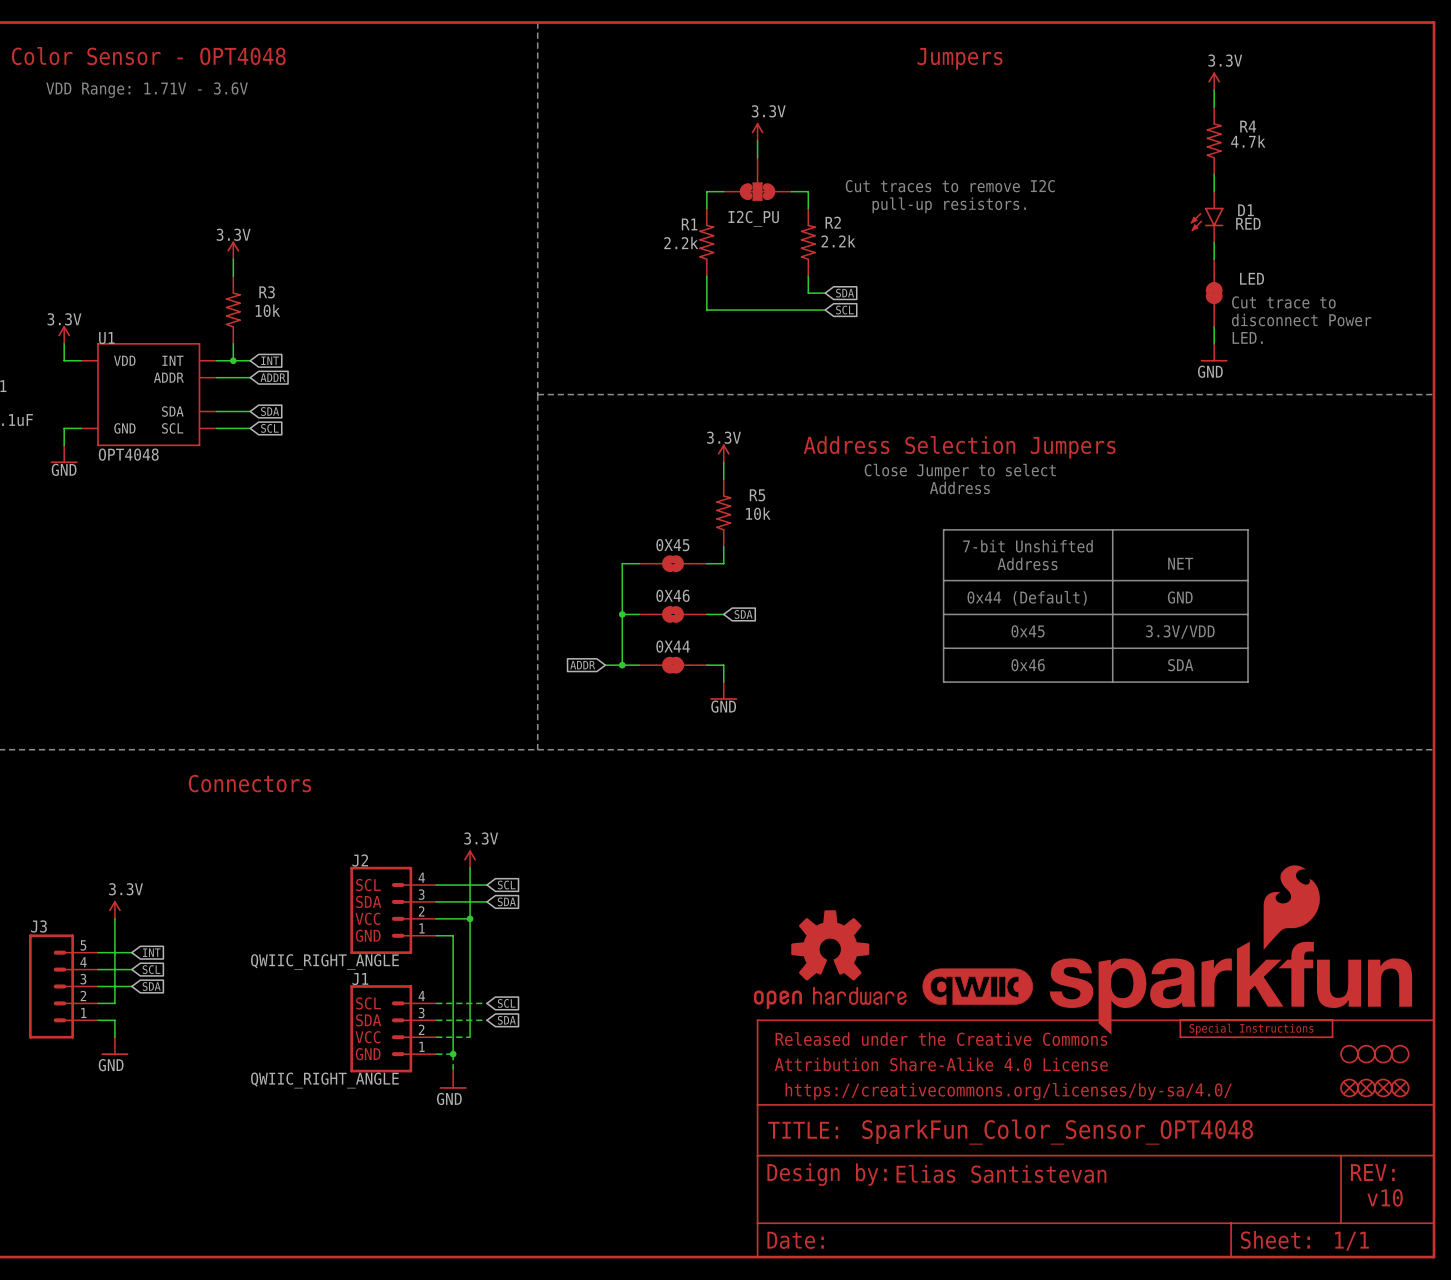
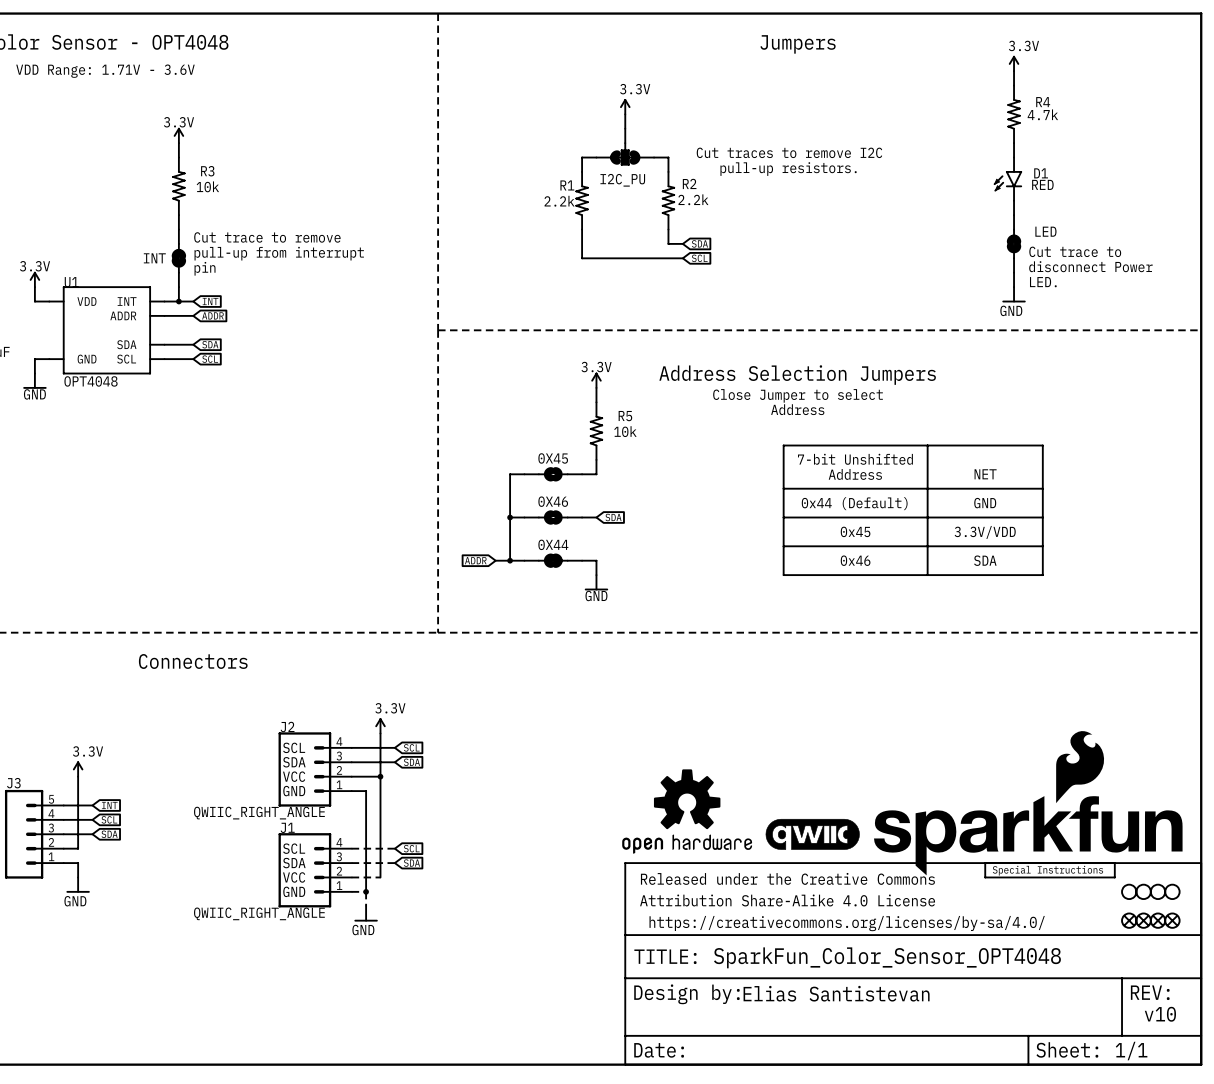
wire: none -> (178, 143) (178, 157)
power symbol position: 3.3V (233, 250) -> 3.3V (178, 135)
text: none -> Cut trace to remove (267, 237)
text: none -> pull-up from interrupt (279, 253)
R3 position: (233, 310) -> (178, 186)
INT: none -> (178, 258)
text: none -> pin (205, 268)

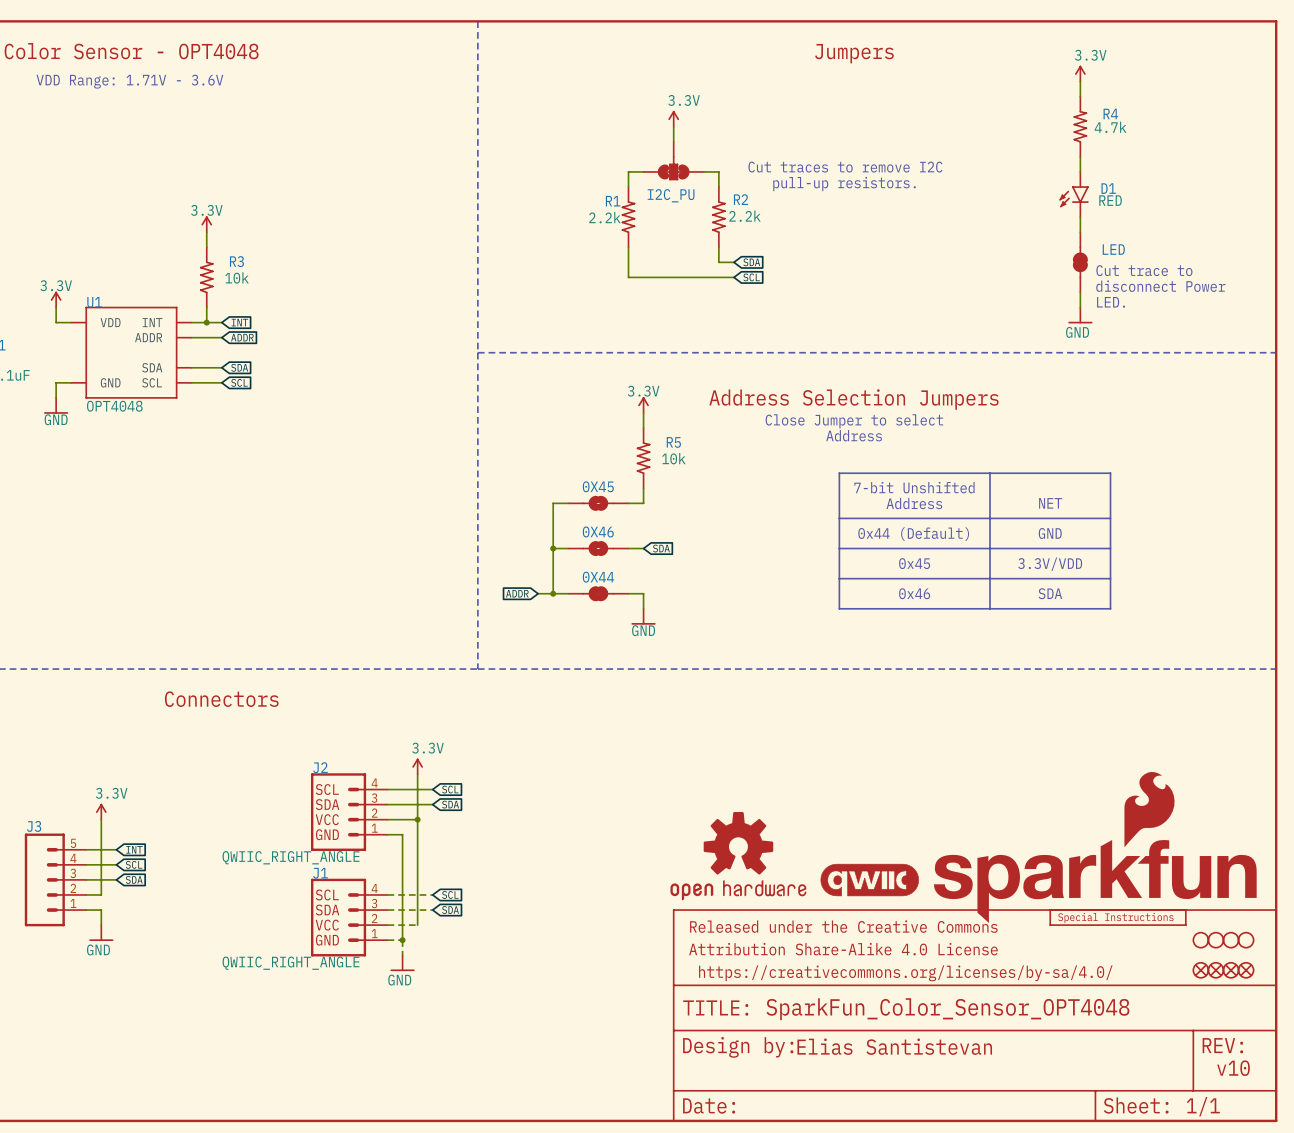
power symbol position: 3.3V (178, 135) -> 3.3V (206, 224)
wire: (178, 143) (178, 157) -> none
R3 position: (178, 186) -> (206, 277)
text: Cut trace to remove (267, 237) -> none
text: pull-up from interrupt (279, 253) -> none
INT: (178, 258) -> none
text: pin (205, 268) -> none

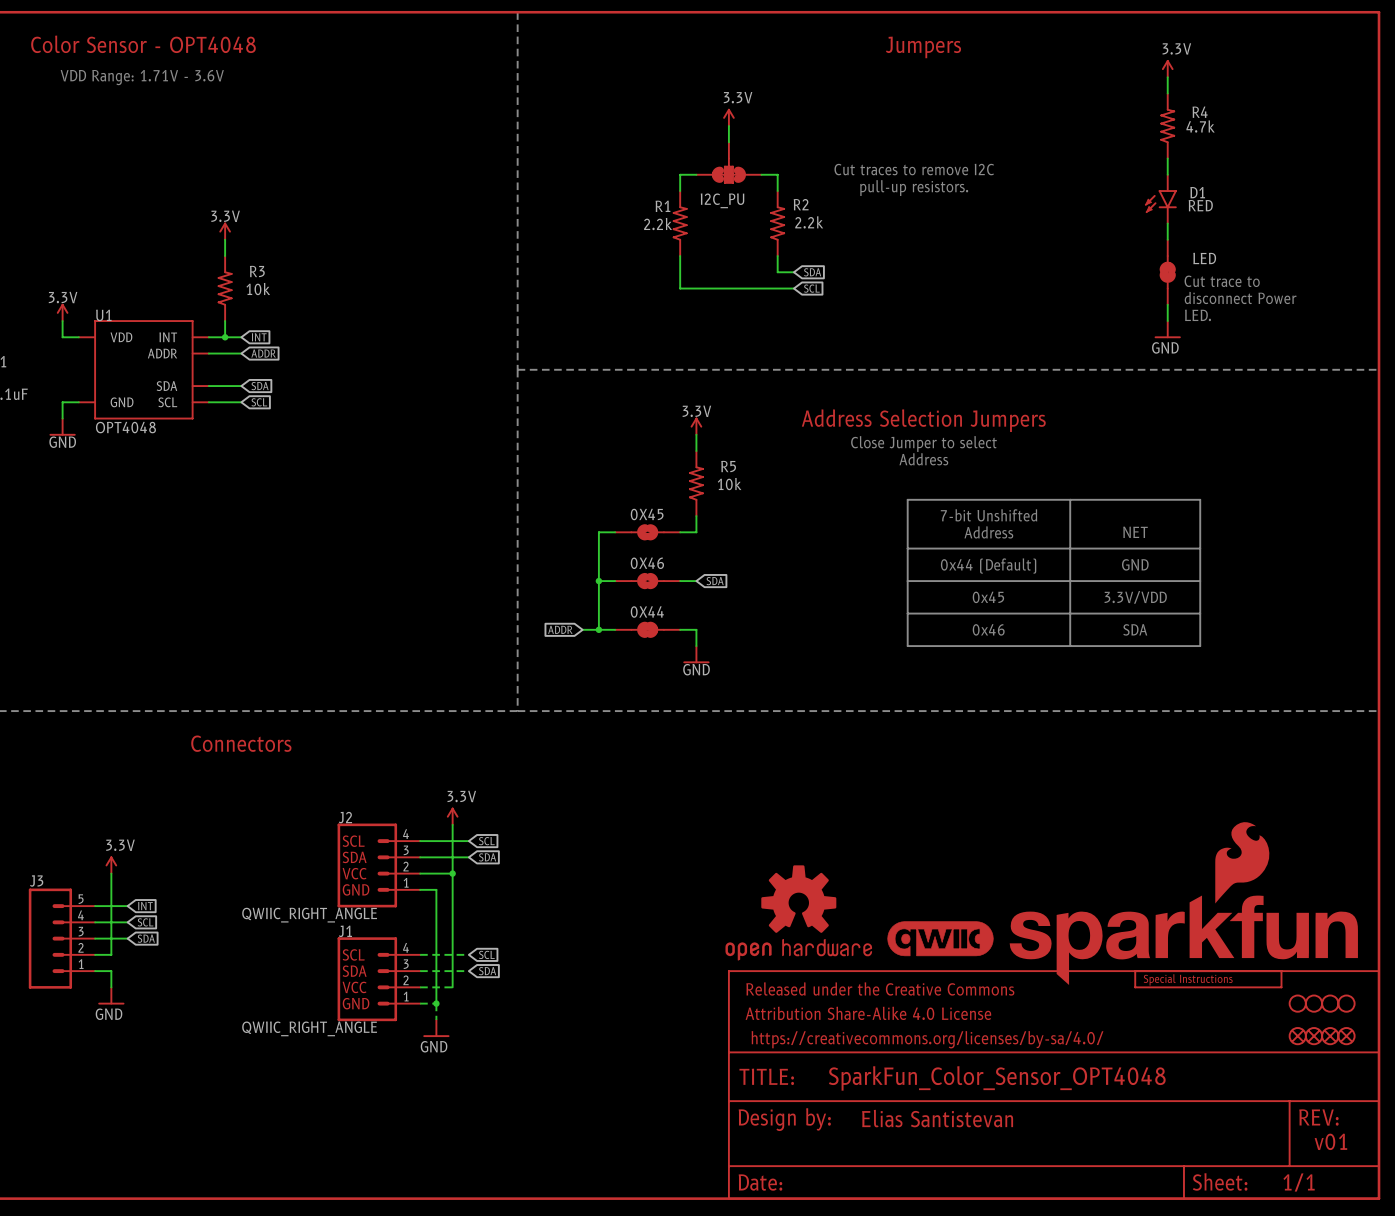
text: v10 (1233, 1068) -> v01 (1330, 1141)

